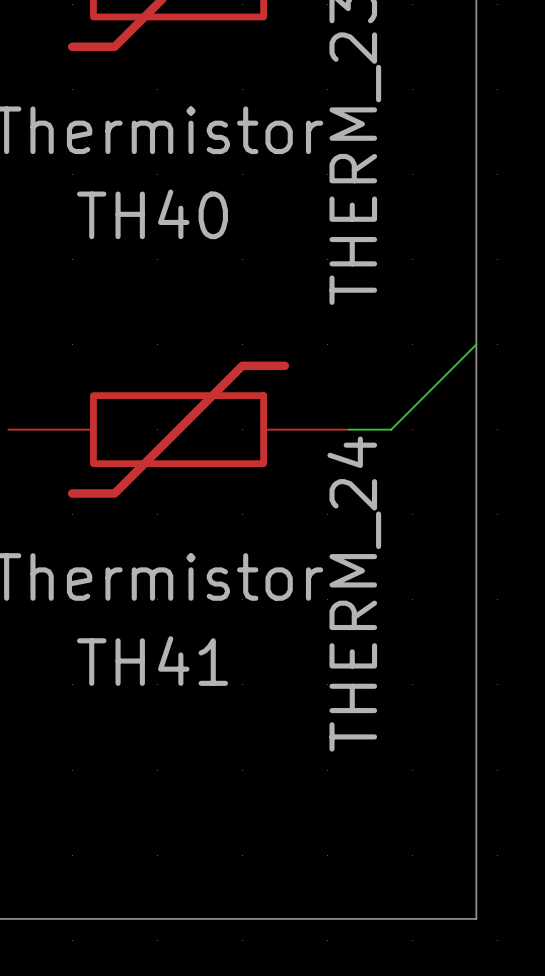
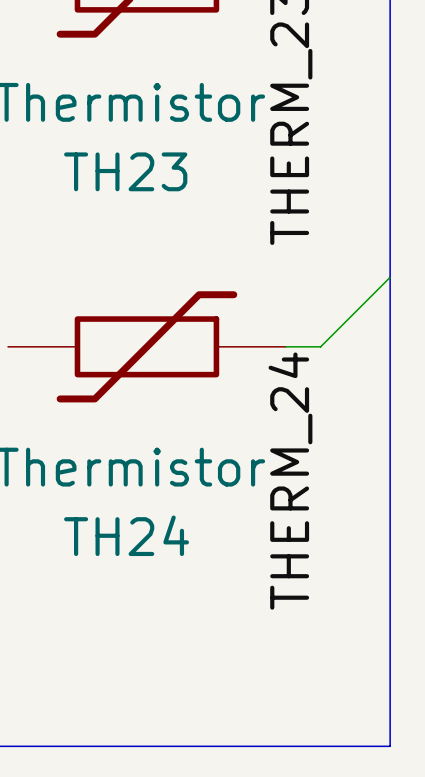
TH40 name: TH40 (152, 214) -> TH23 (125, 171)
TH41 name: TH41 (152, 661) -> TH24 (126, 535)

